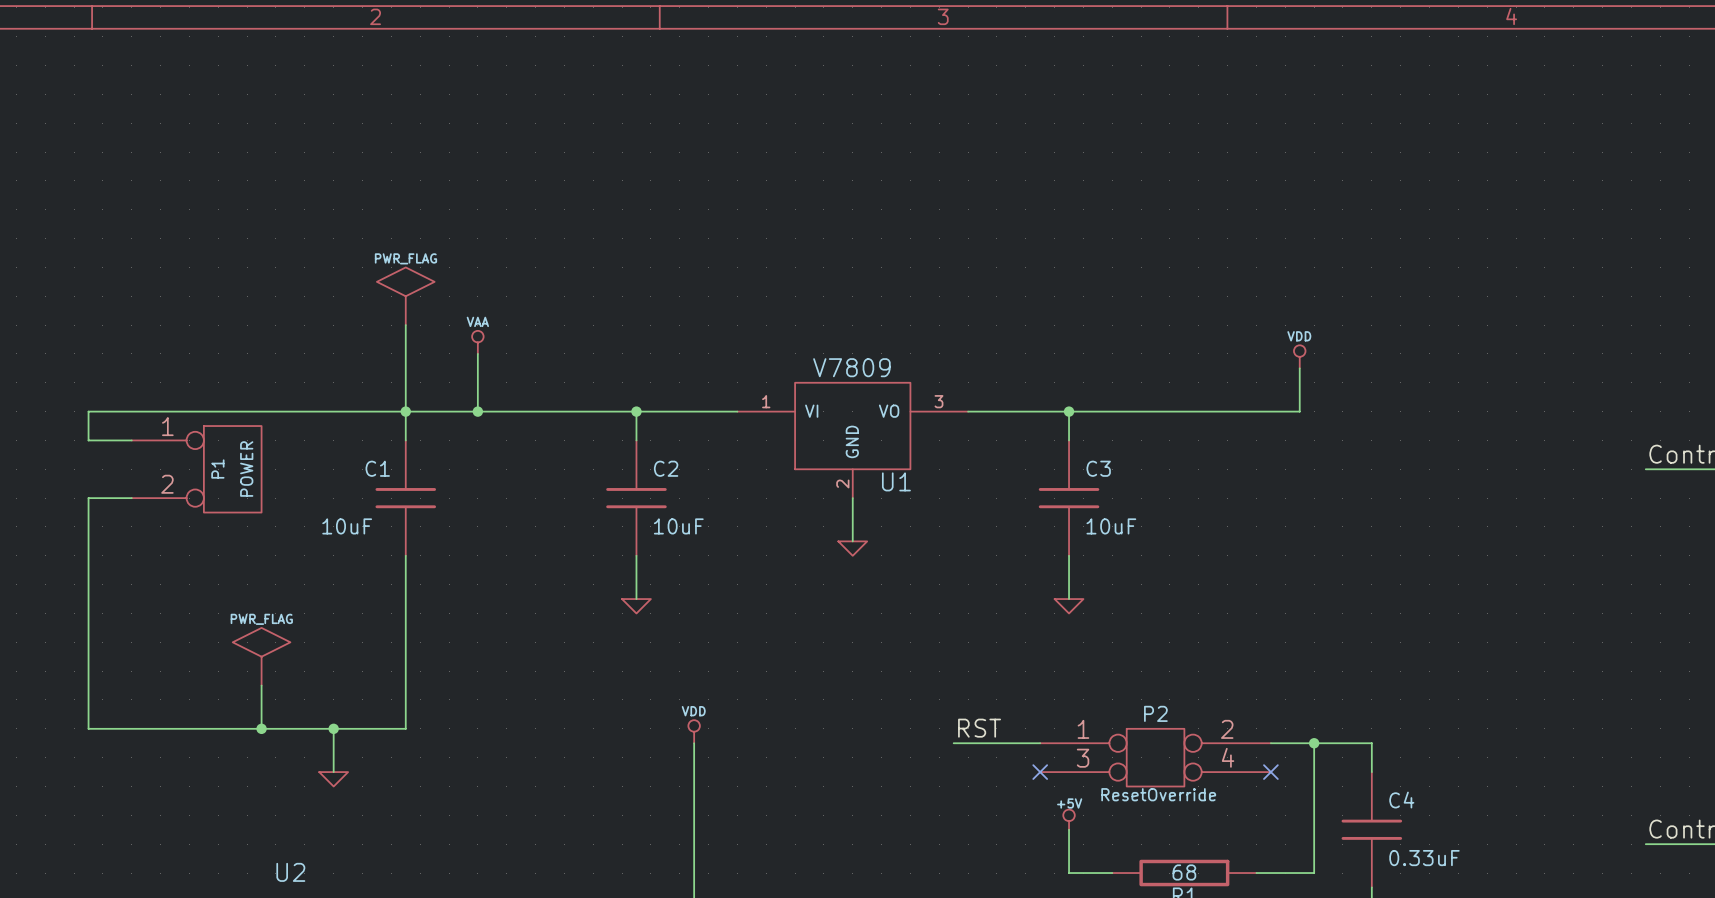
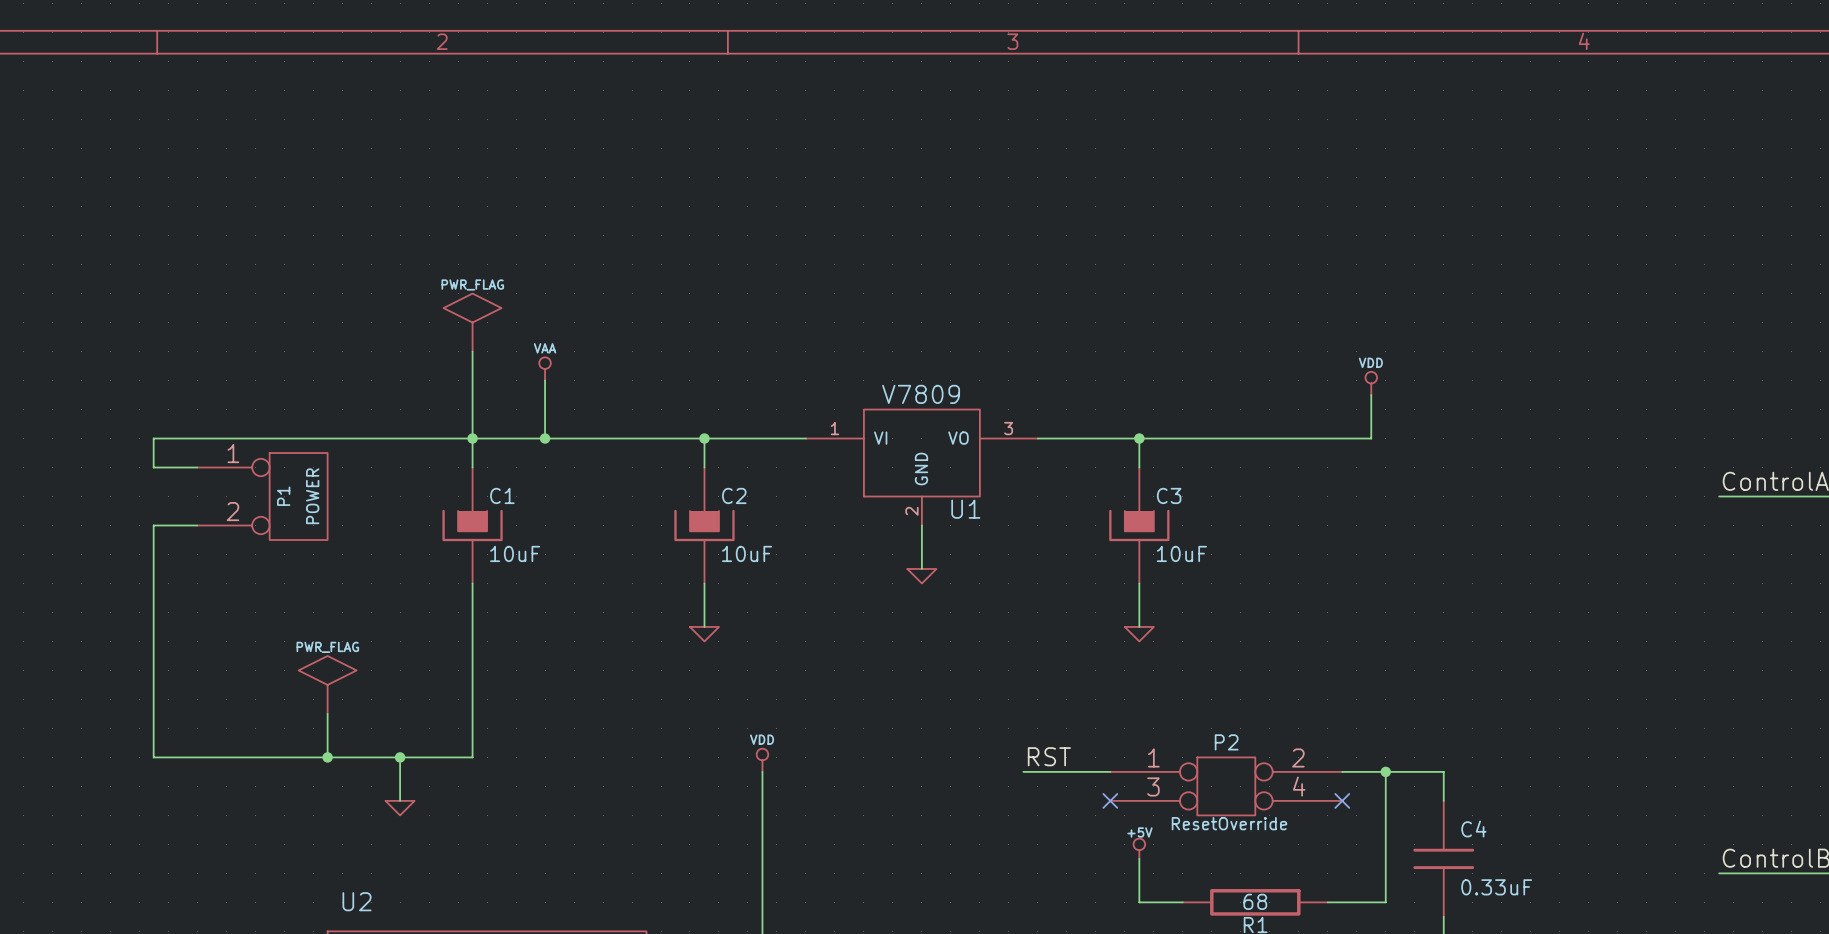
C1 symbol: [375, 440, 437, 556] -> [442, 467, 503, 584]
C2 symbol: [606, 440, 667, 556] -> [674, 467, 735, 584]
C3 symbol: [1038, 440, 1100, 556] -> [1109, 467, 1170, 584]
C1 name position: C1 (377, 468) -> C1 (502, 495)
C1 value position: 10uF (347, 526) -> 10uF (515, 553)

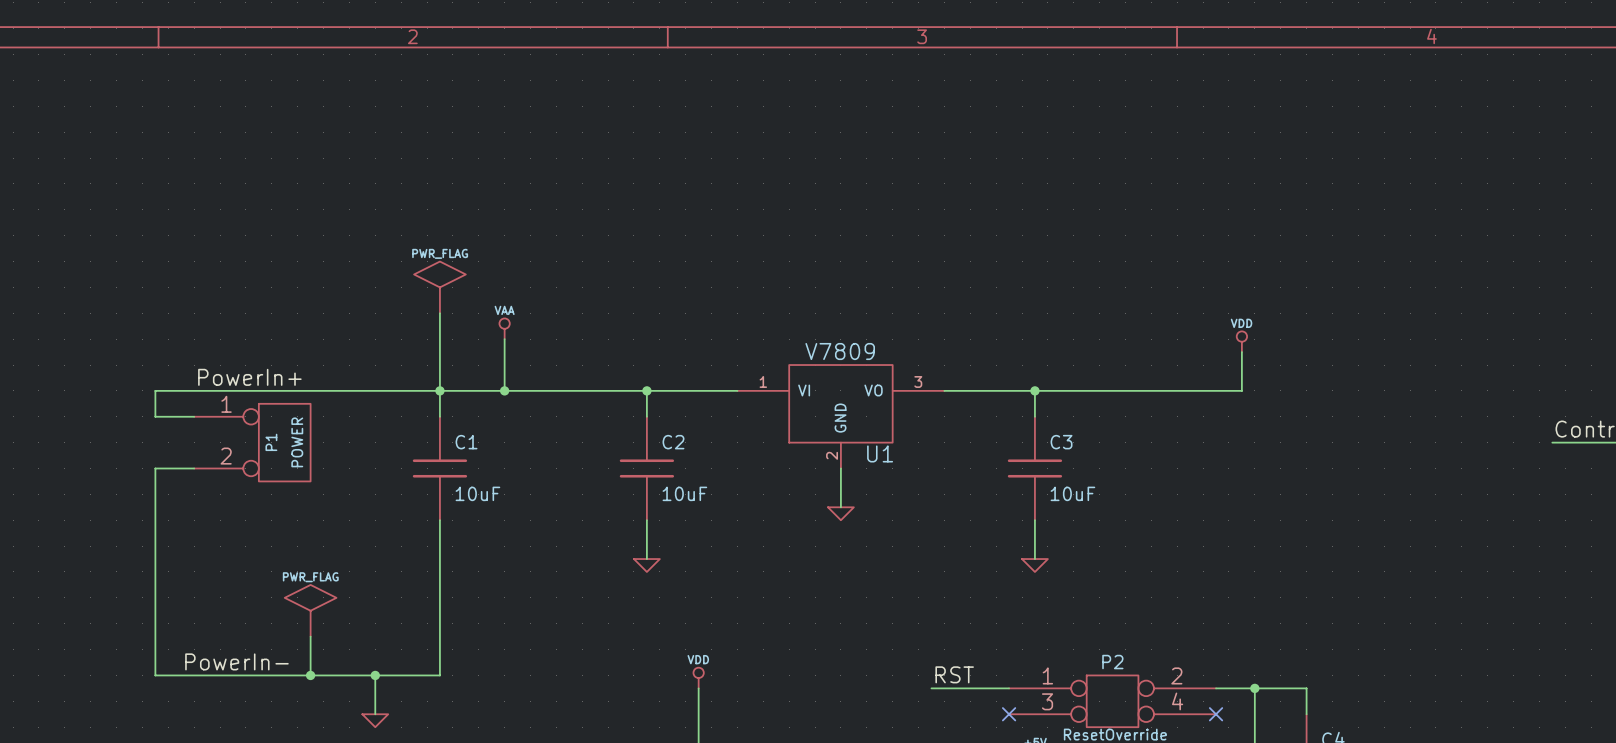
label: none -> PowerIn+ (249, 377)
C1 symbol: [442, 467, 503, 584] -> [412, 416, 468, 521]
C2 symbol: [674, 467, 735, 584] -> [619, 416, 675, 521]
C3 symbol: [1109, 467, 1170, 584] -> [1007, 416, 1063, 521]
label: none -> PowerIn- (236, 661)

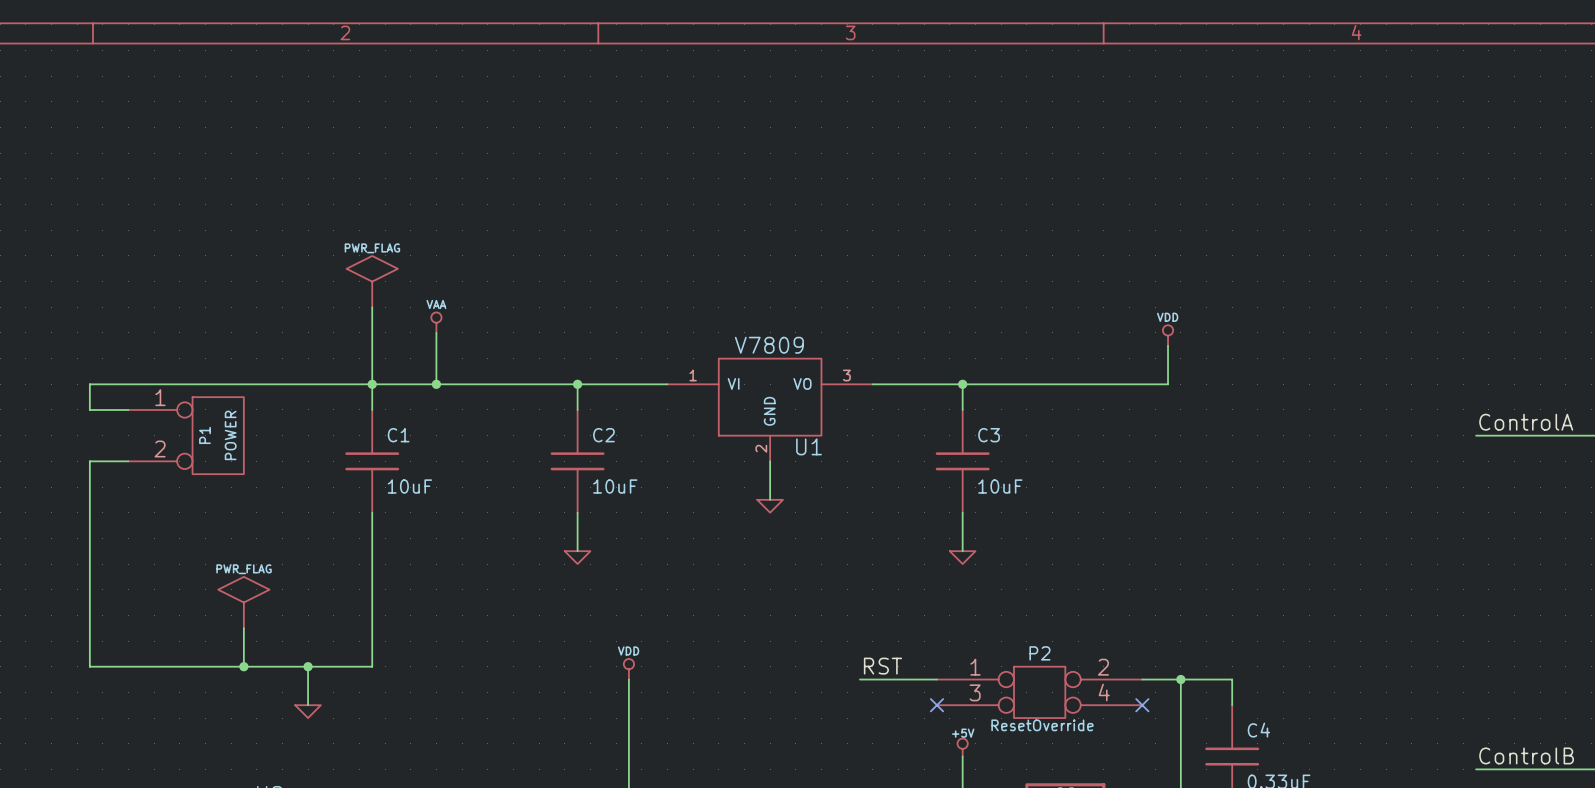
label: PowerIn+ (249, 377) -> none
label: PowerIn- (236, 661) -> none

